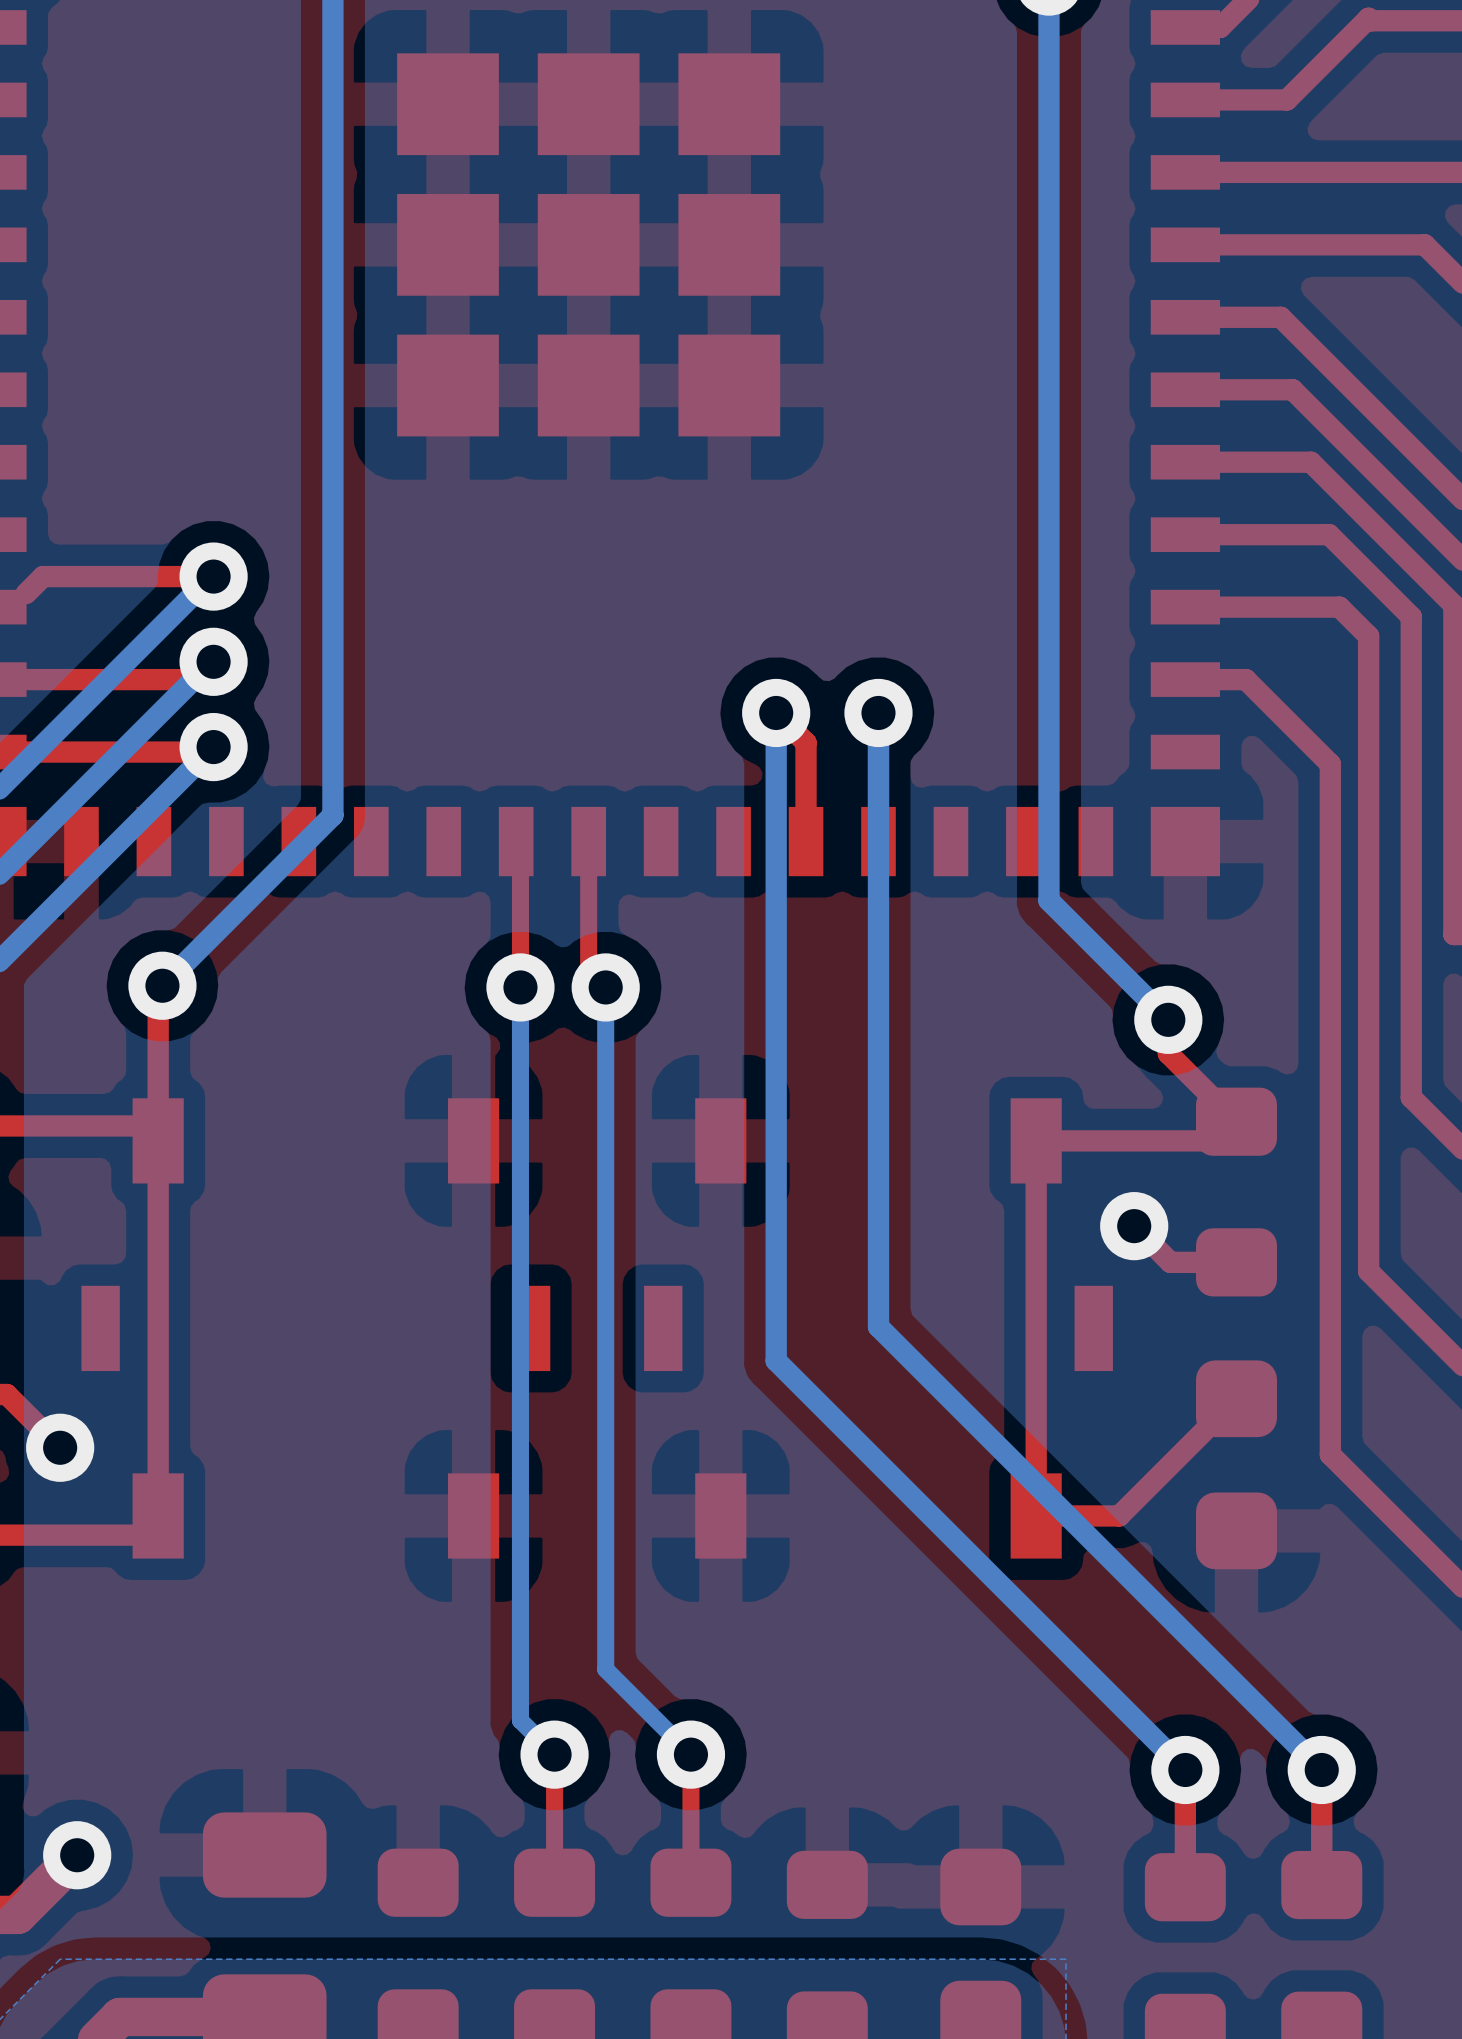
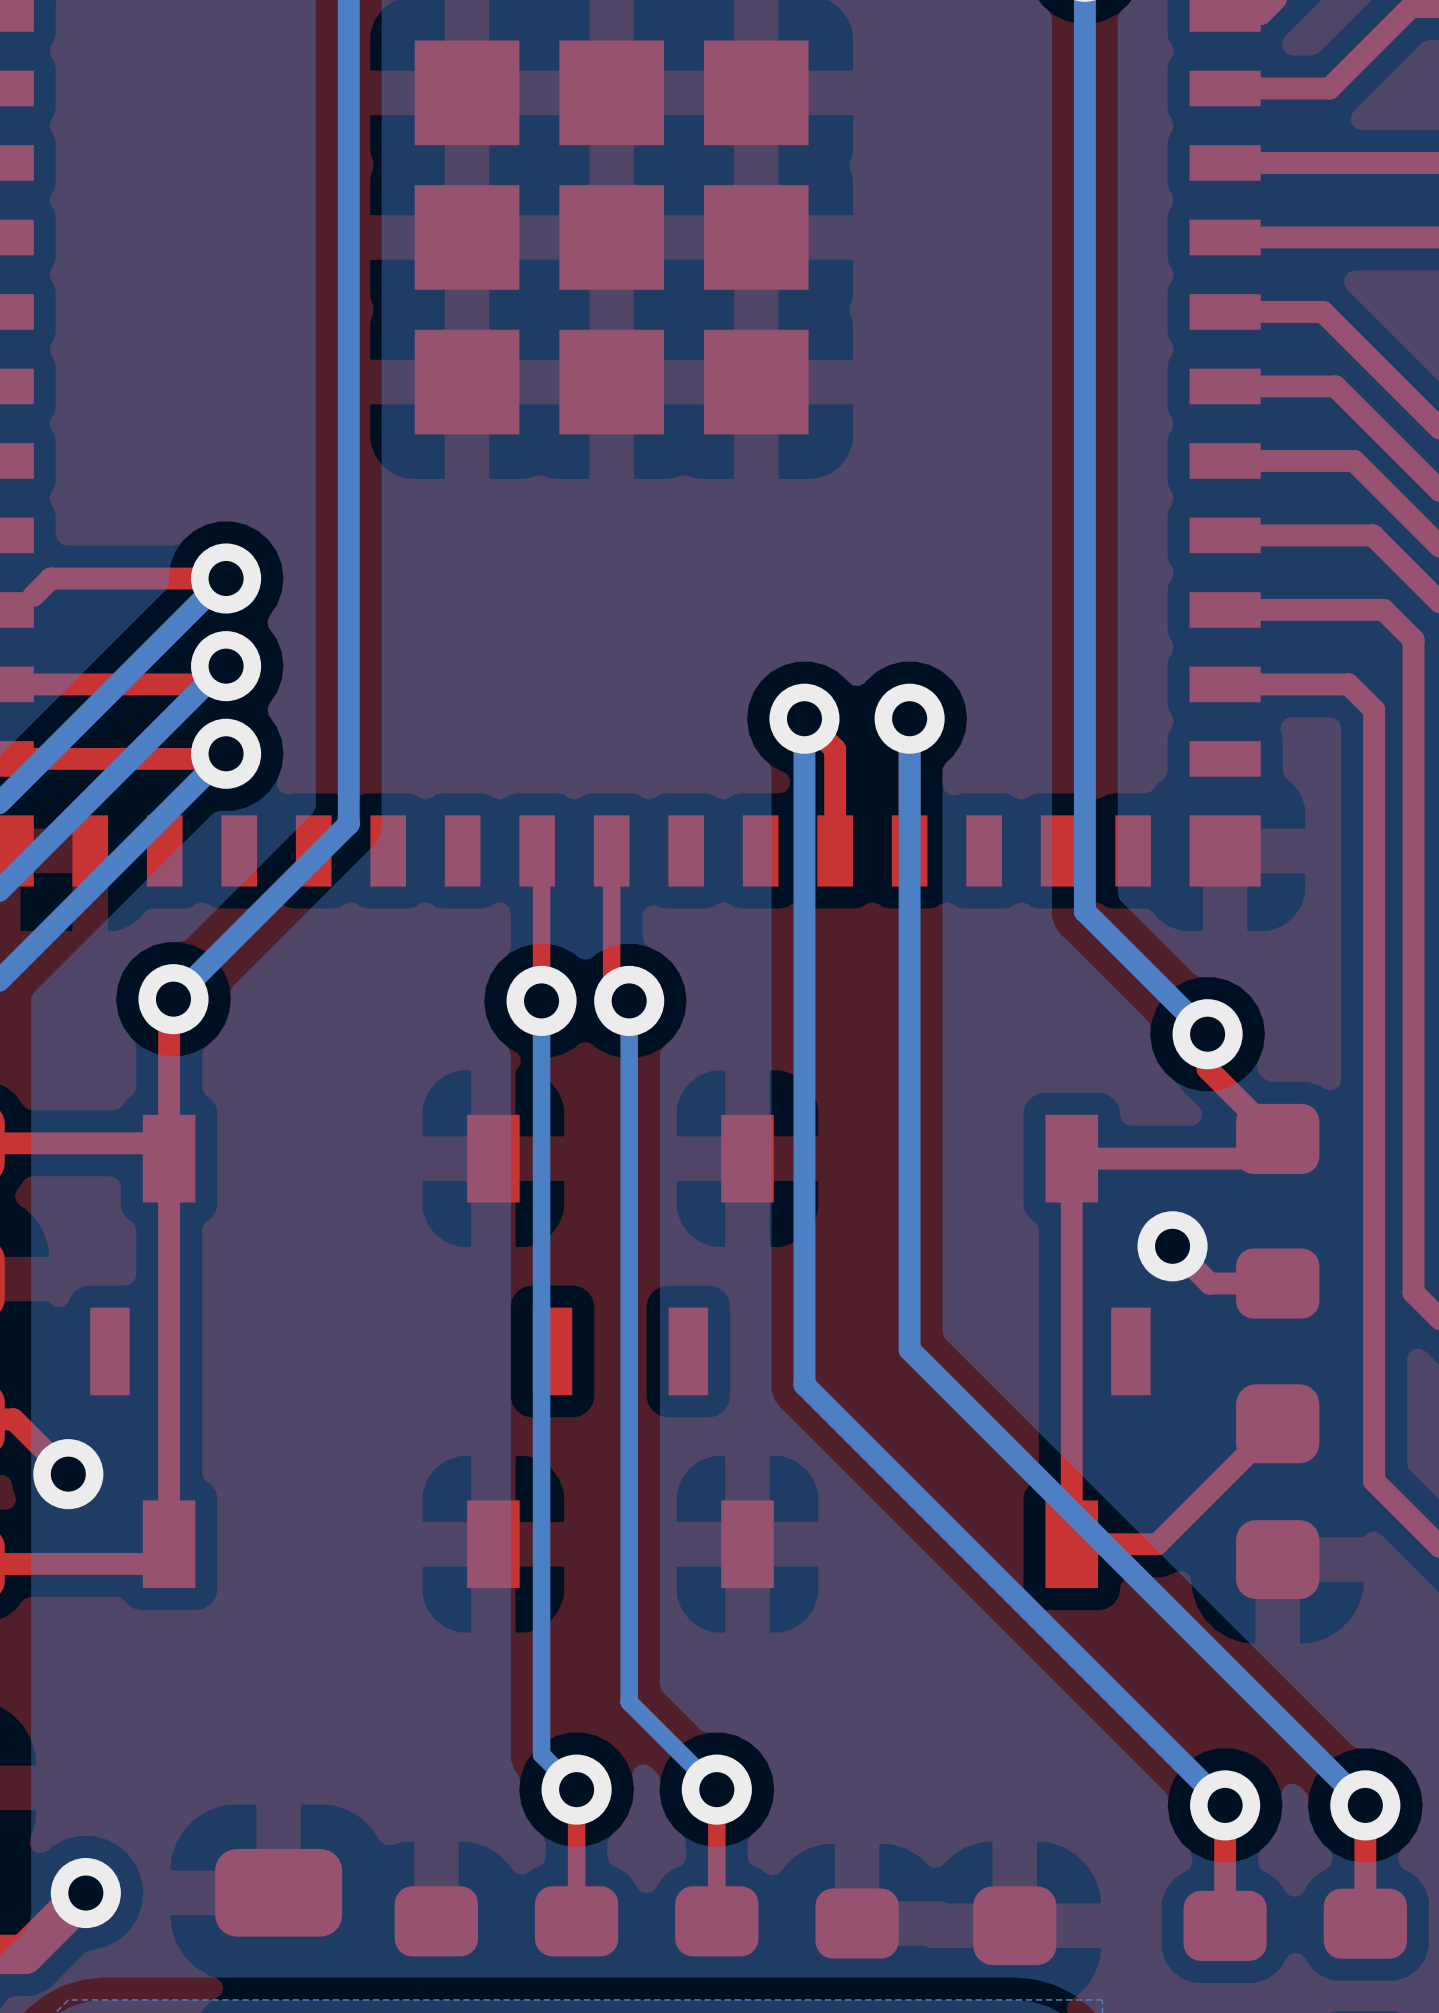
top track: (1245, 679) (1330, 764) -> (1287, 684) (1348, 684) (1374, 710) (1374, 771)

